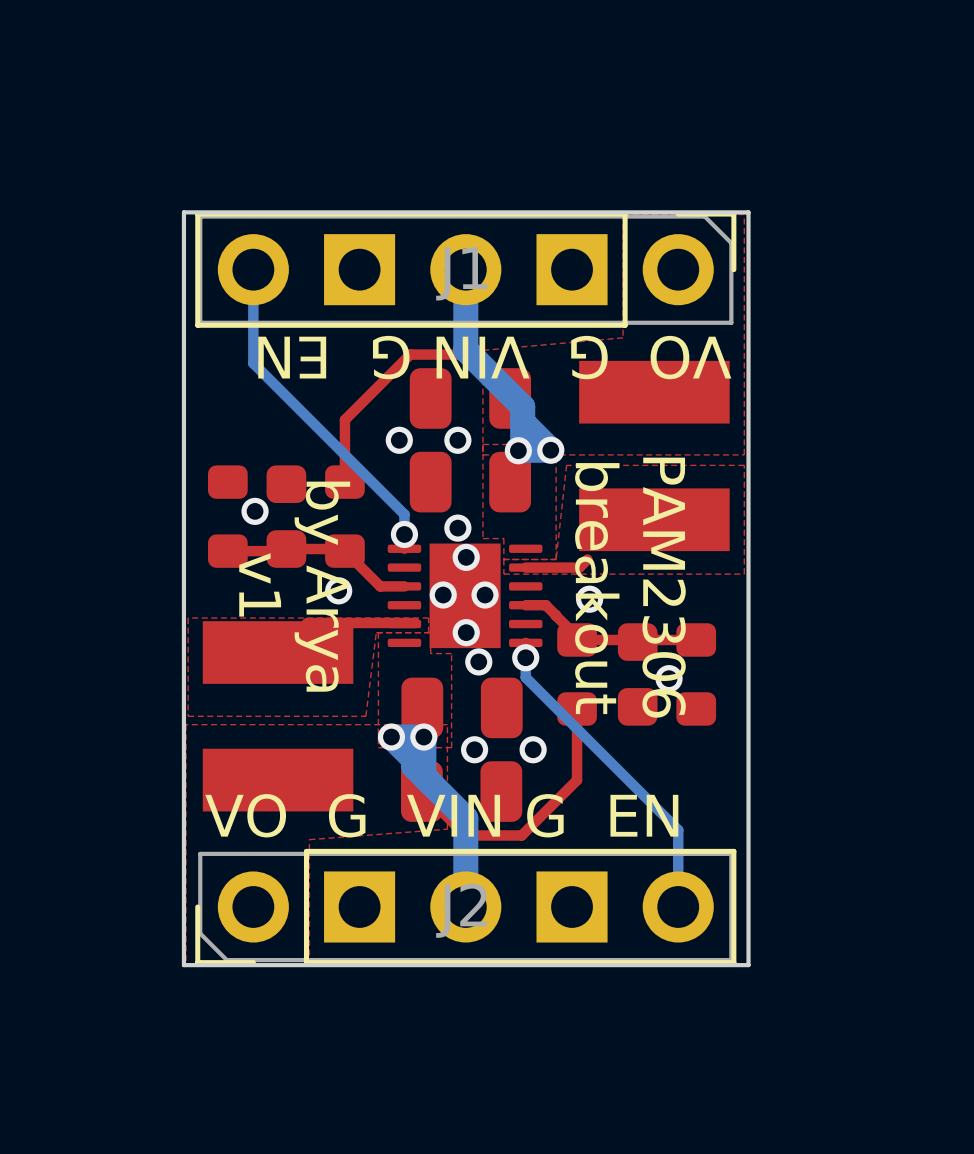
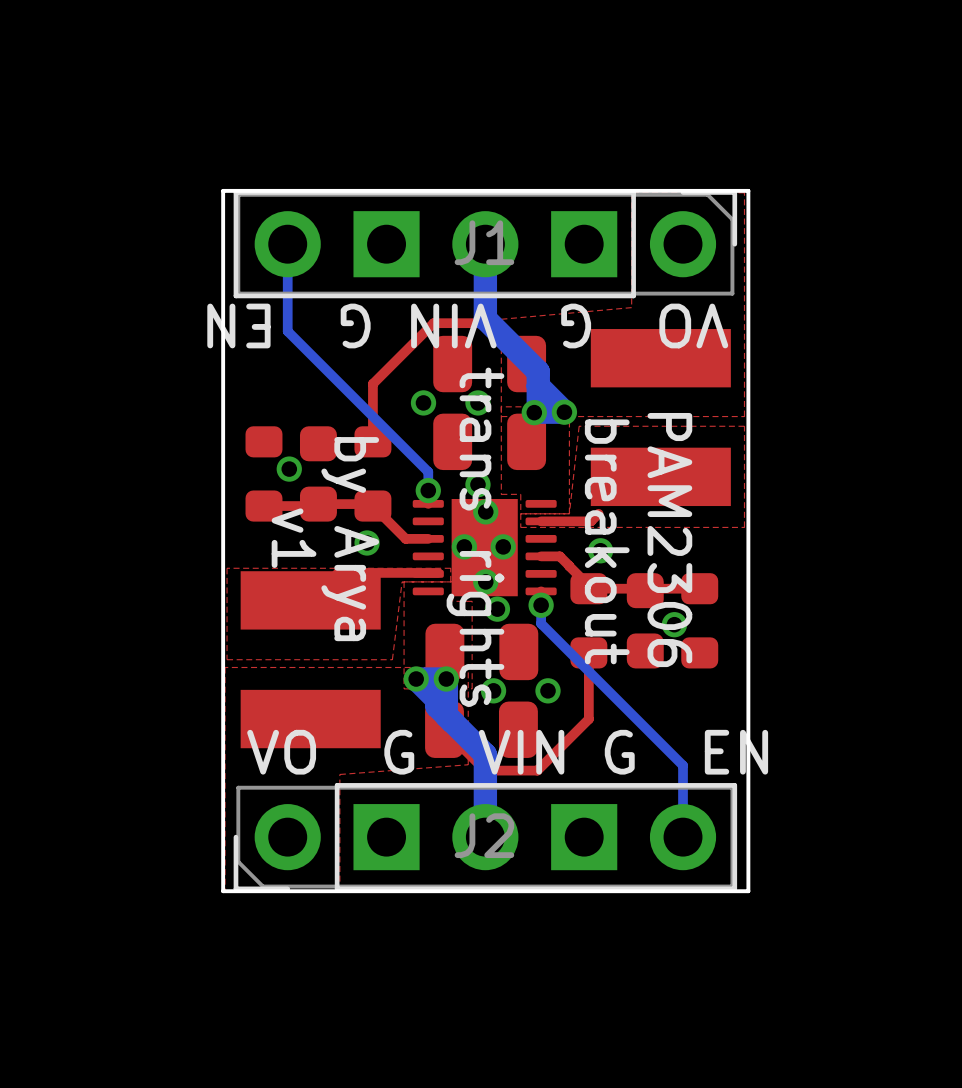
text: none -> trans rights (475, 537)

